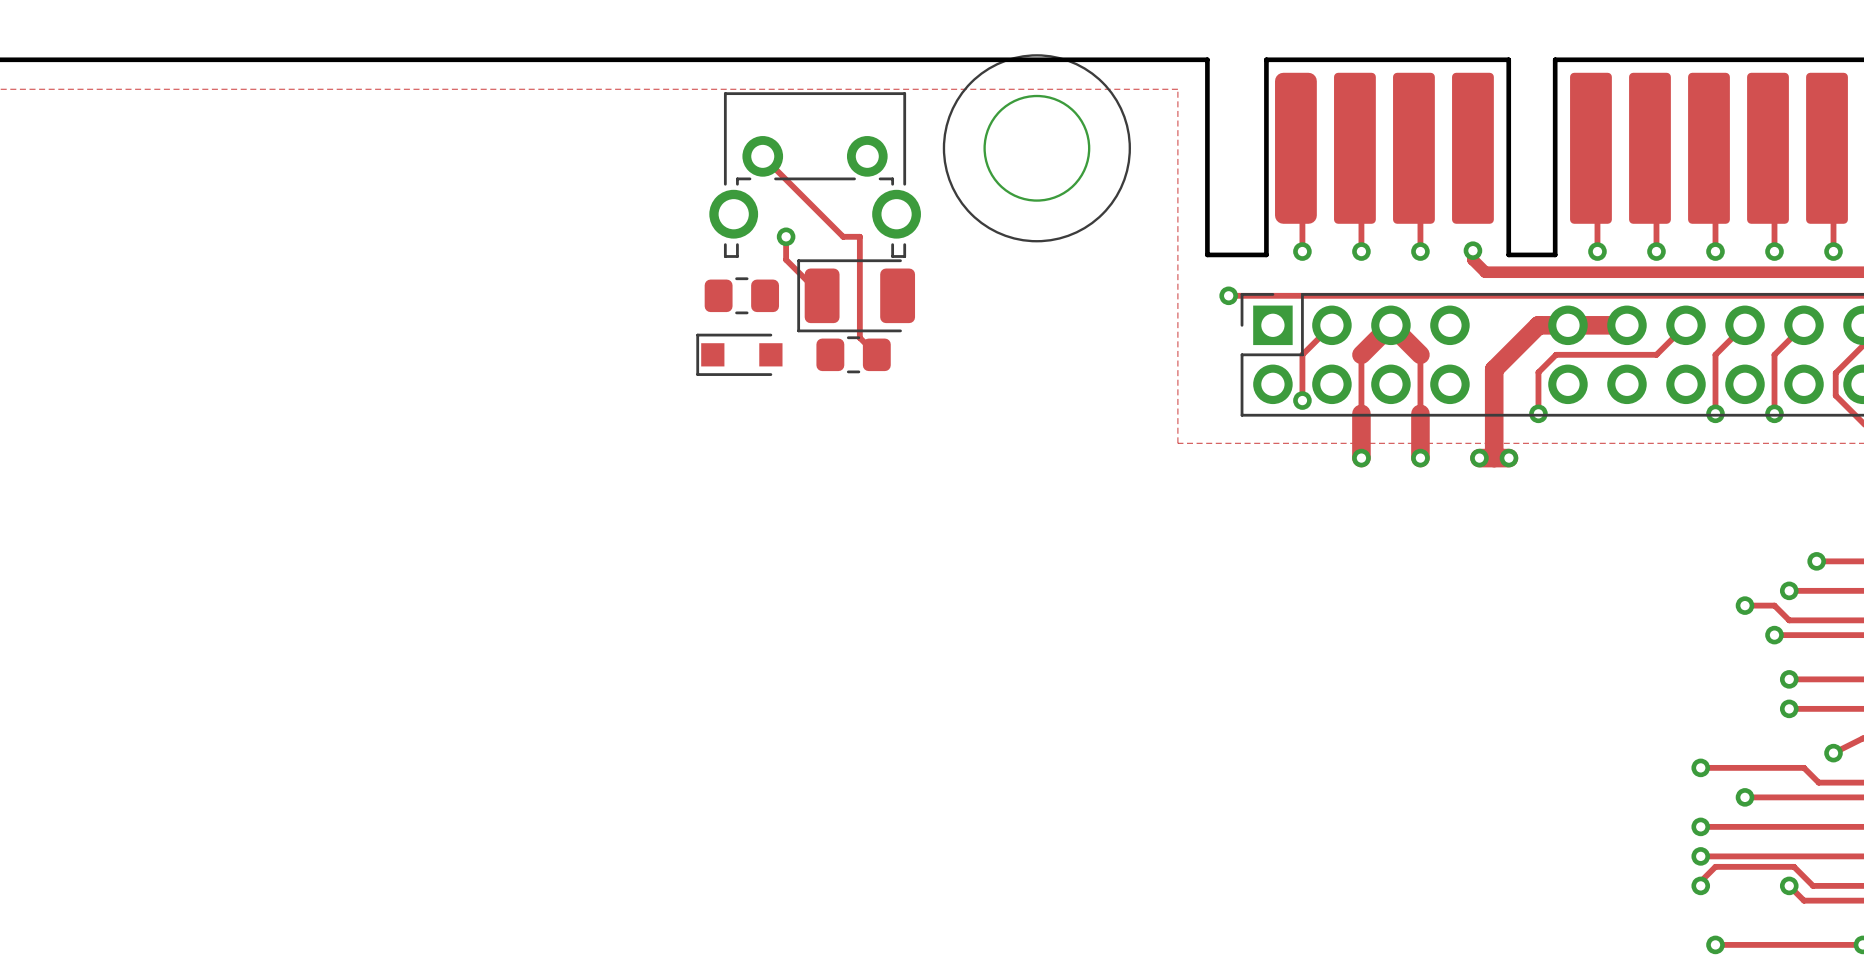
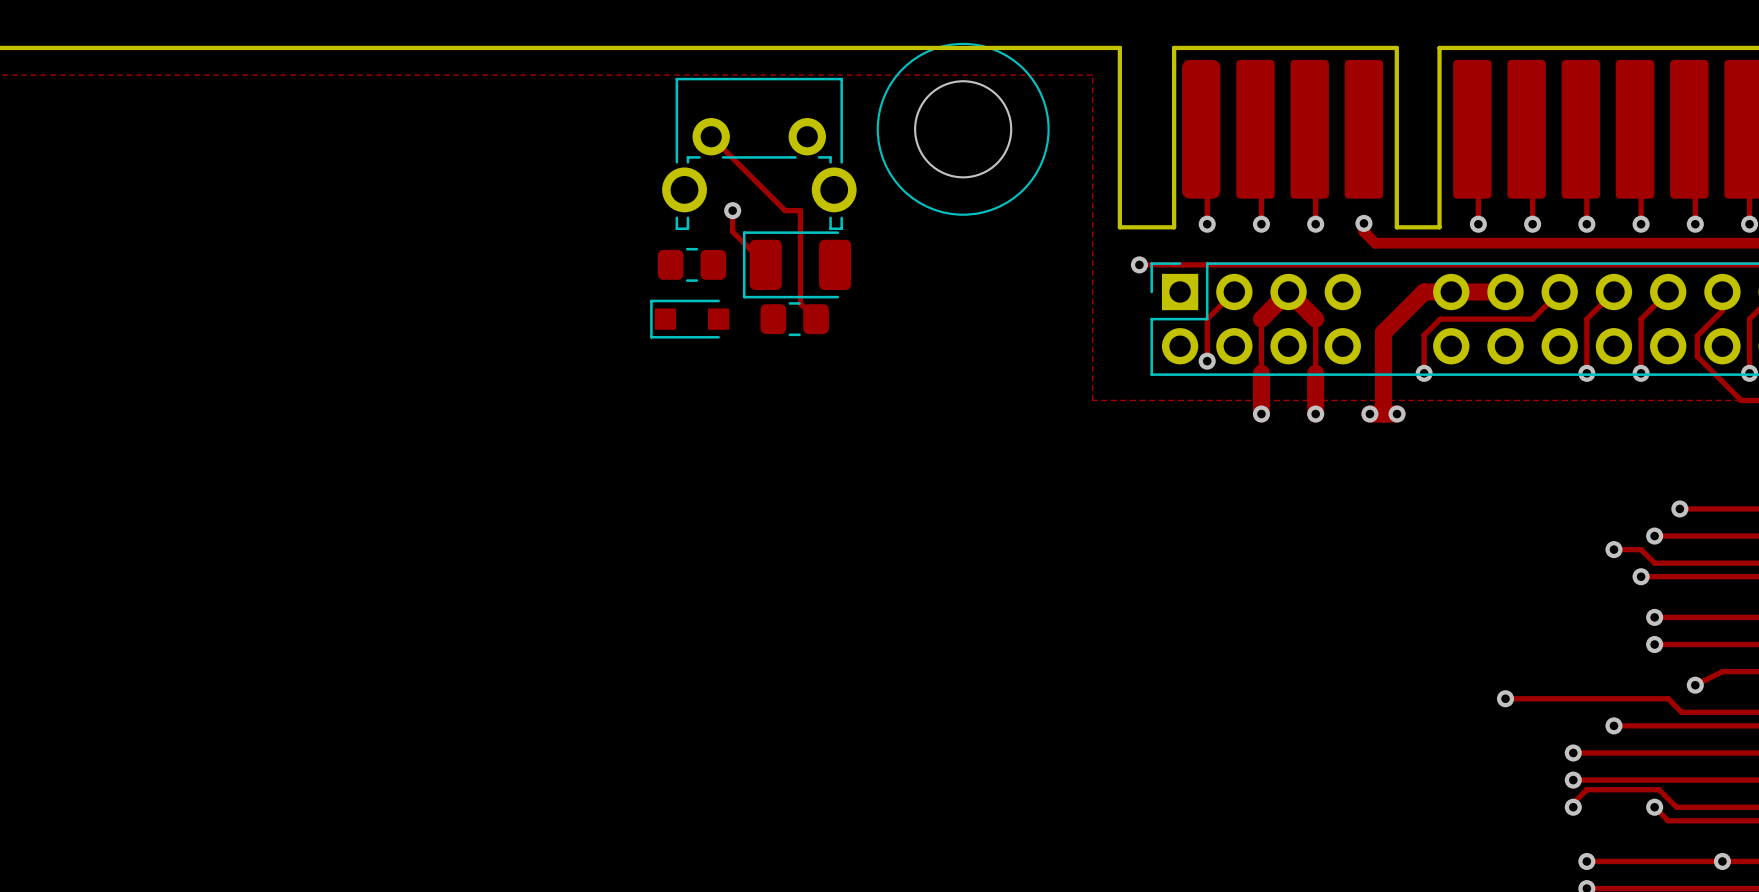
track: none -> (1505, 698) (1573, 698)
via position: (1700, 767) -> (1505, 698)

